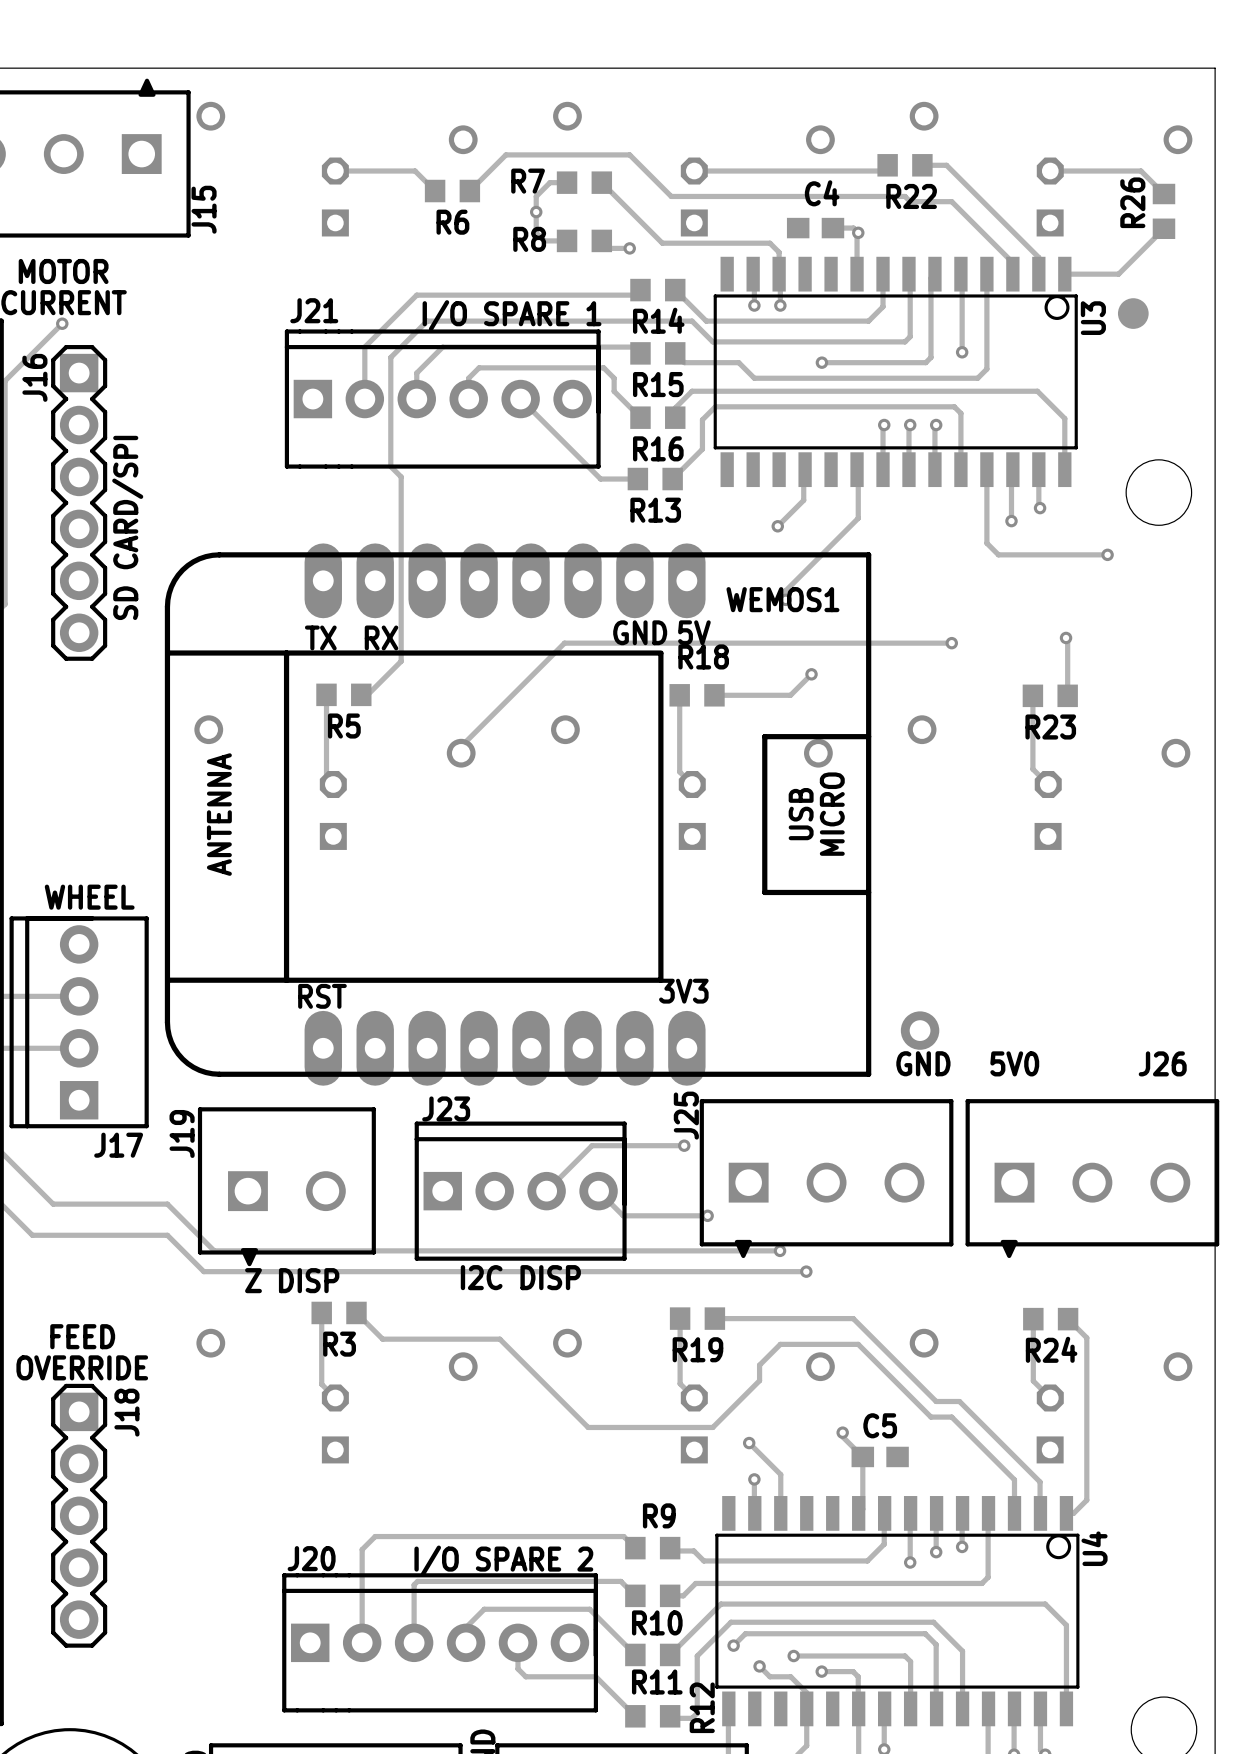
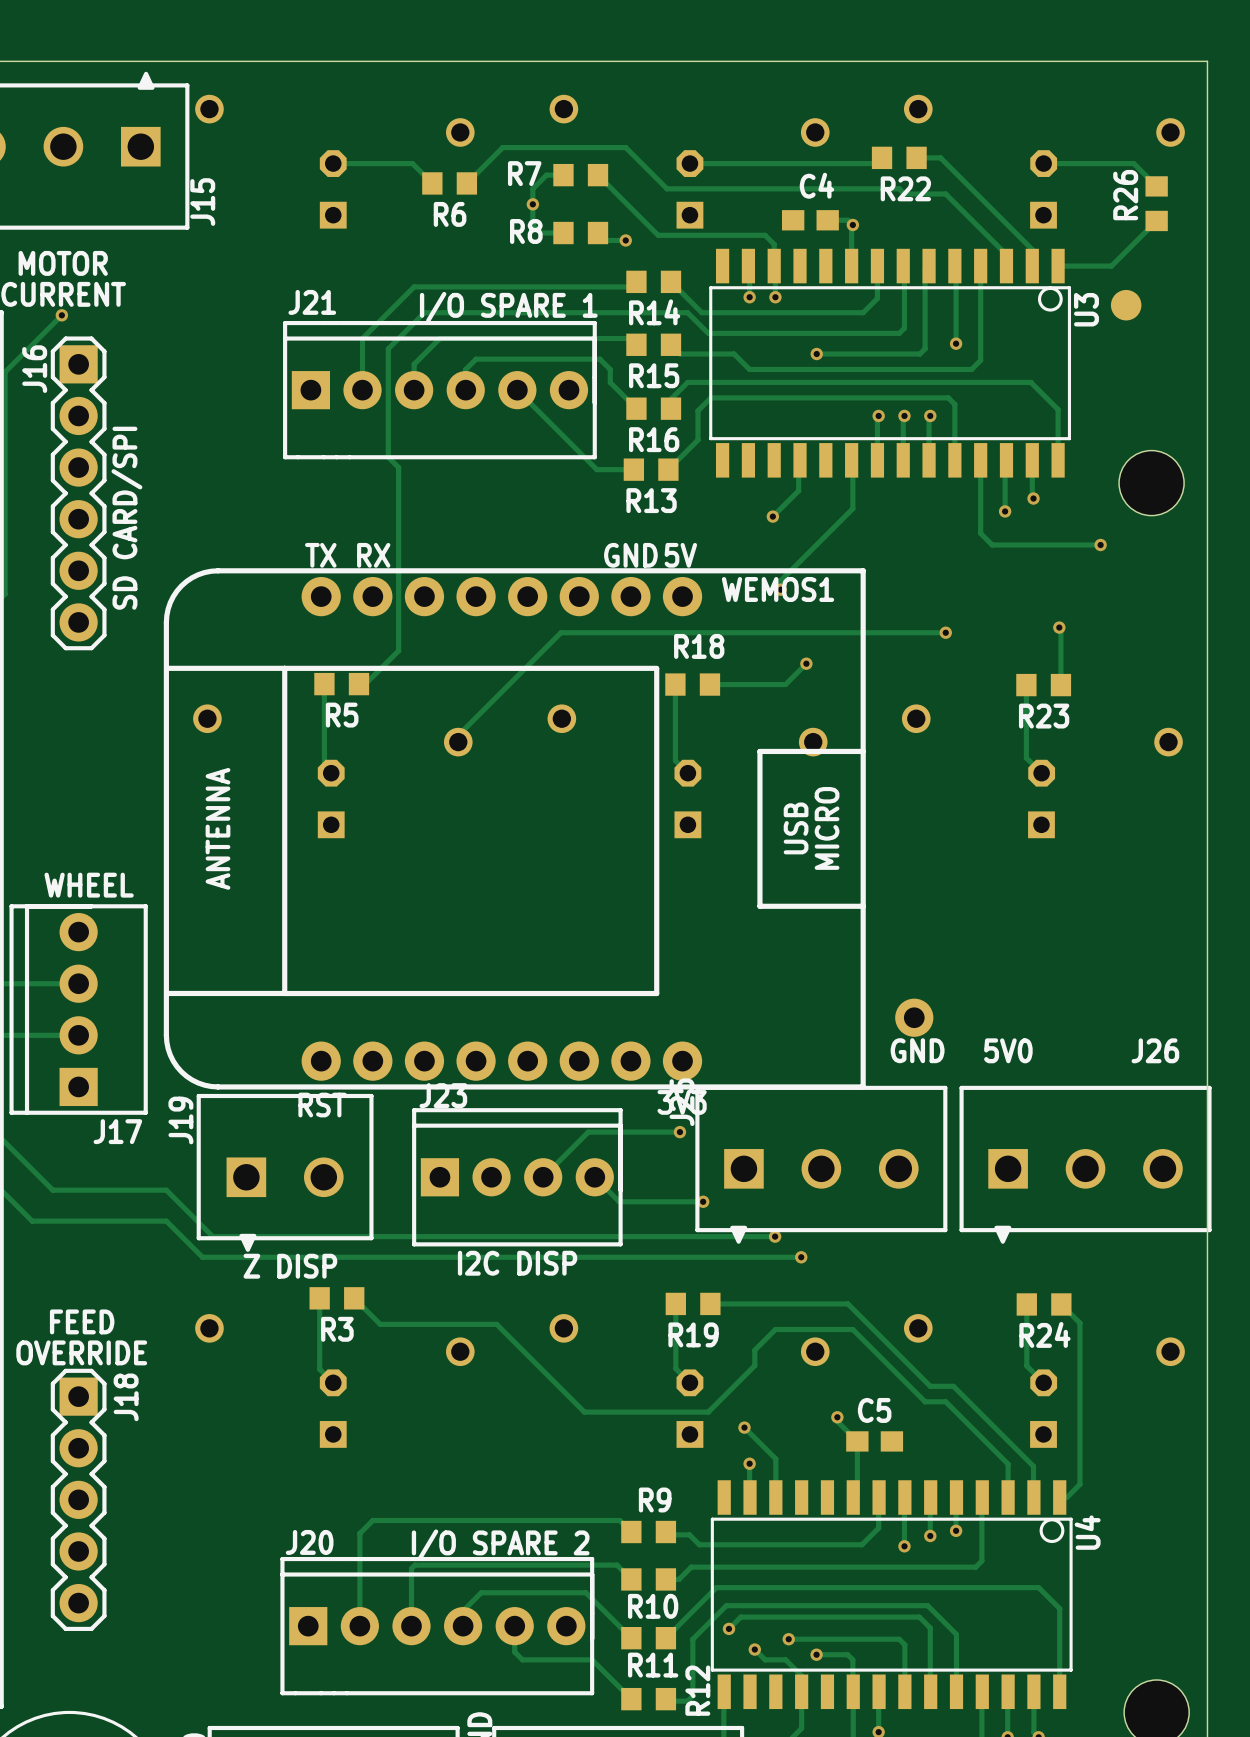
WEMOS1 footprint: [164, 543, 872, 1086] -> [163, 568, 866, 1090]

